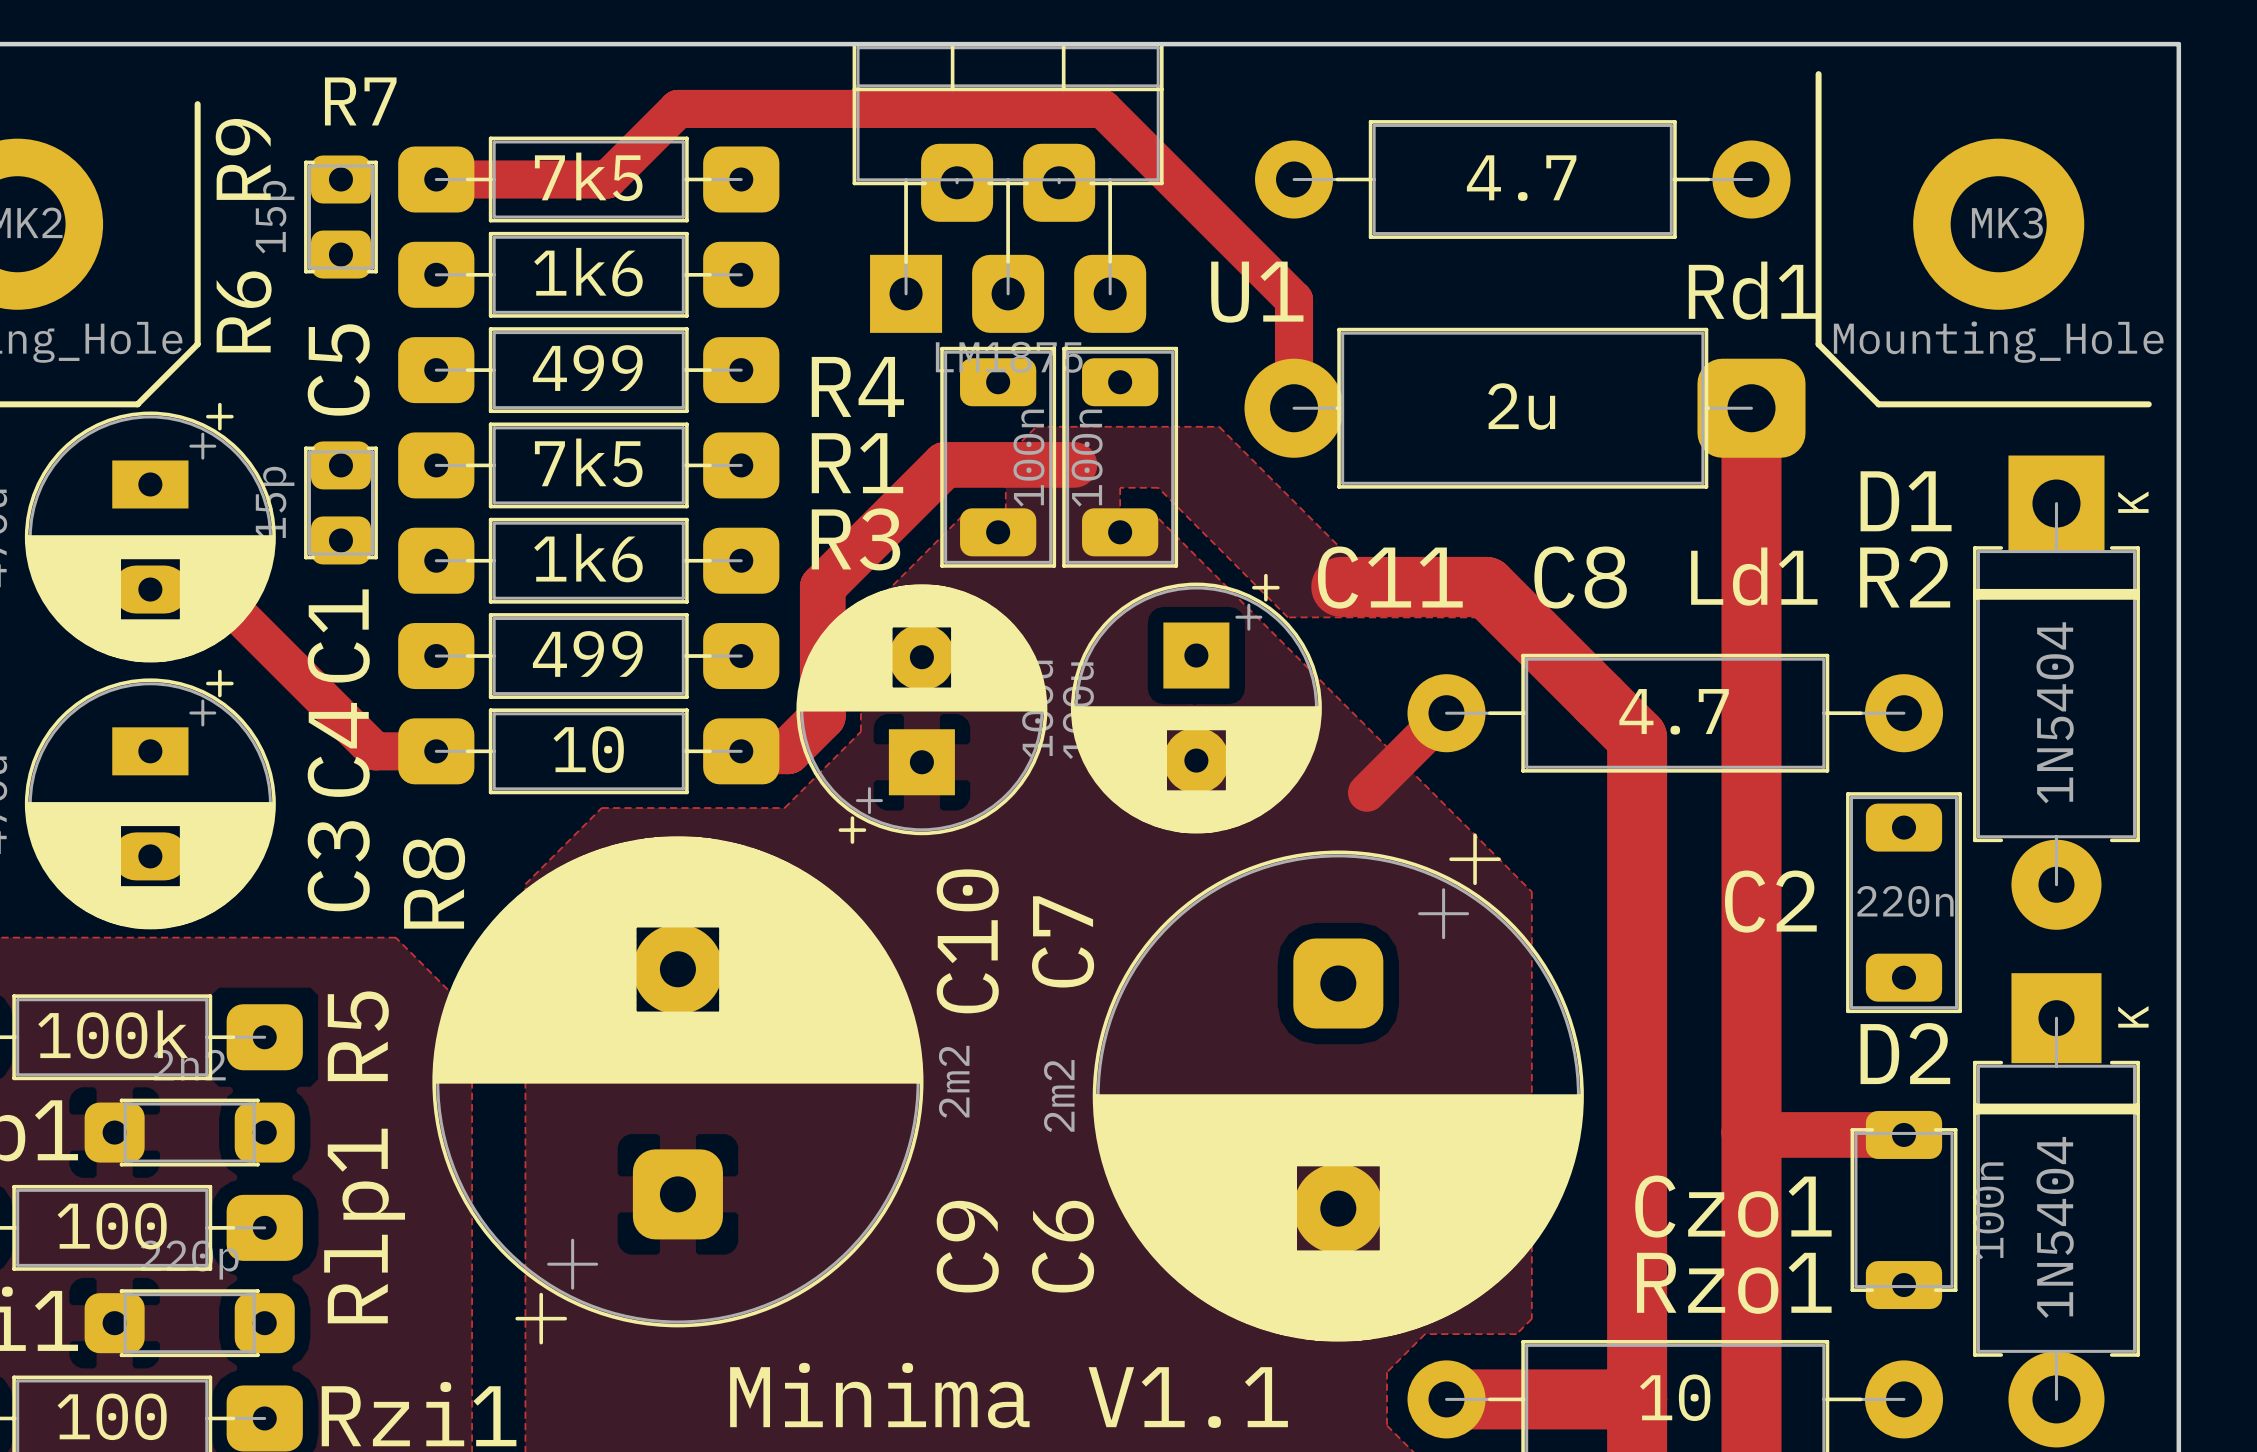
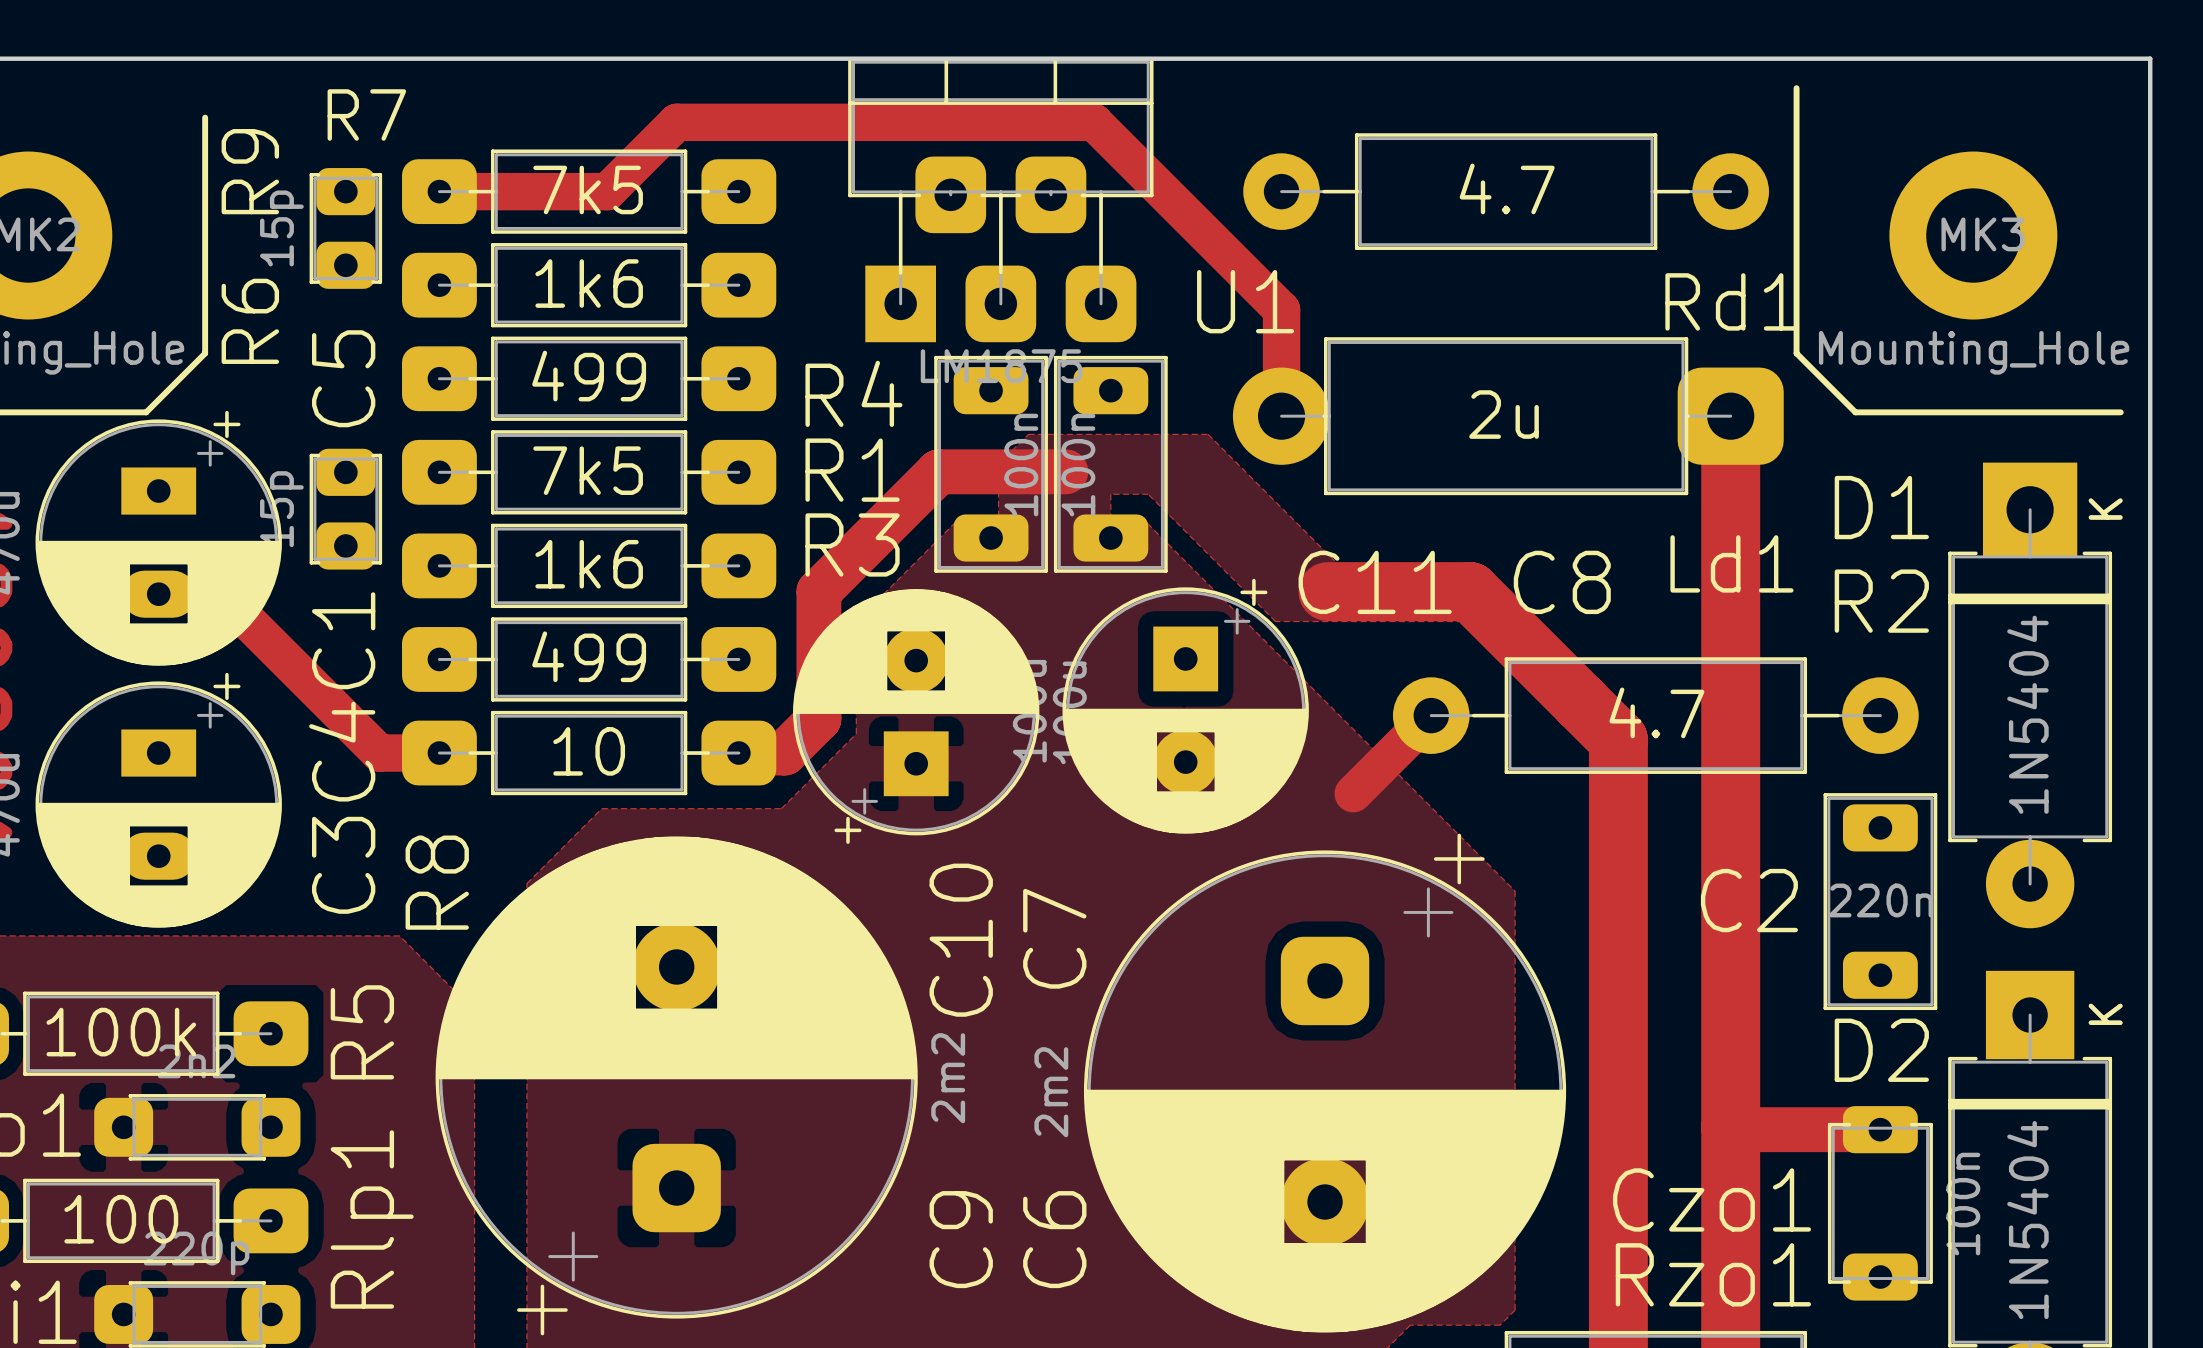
Ld1 name position: Ld1 (1754, 576) -> Ld1 (1731, 563)
R2 name position: R2 (1905, 577) -> R2 (1881, 601)

